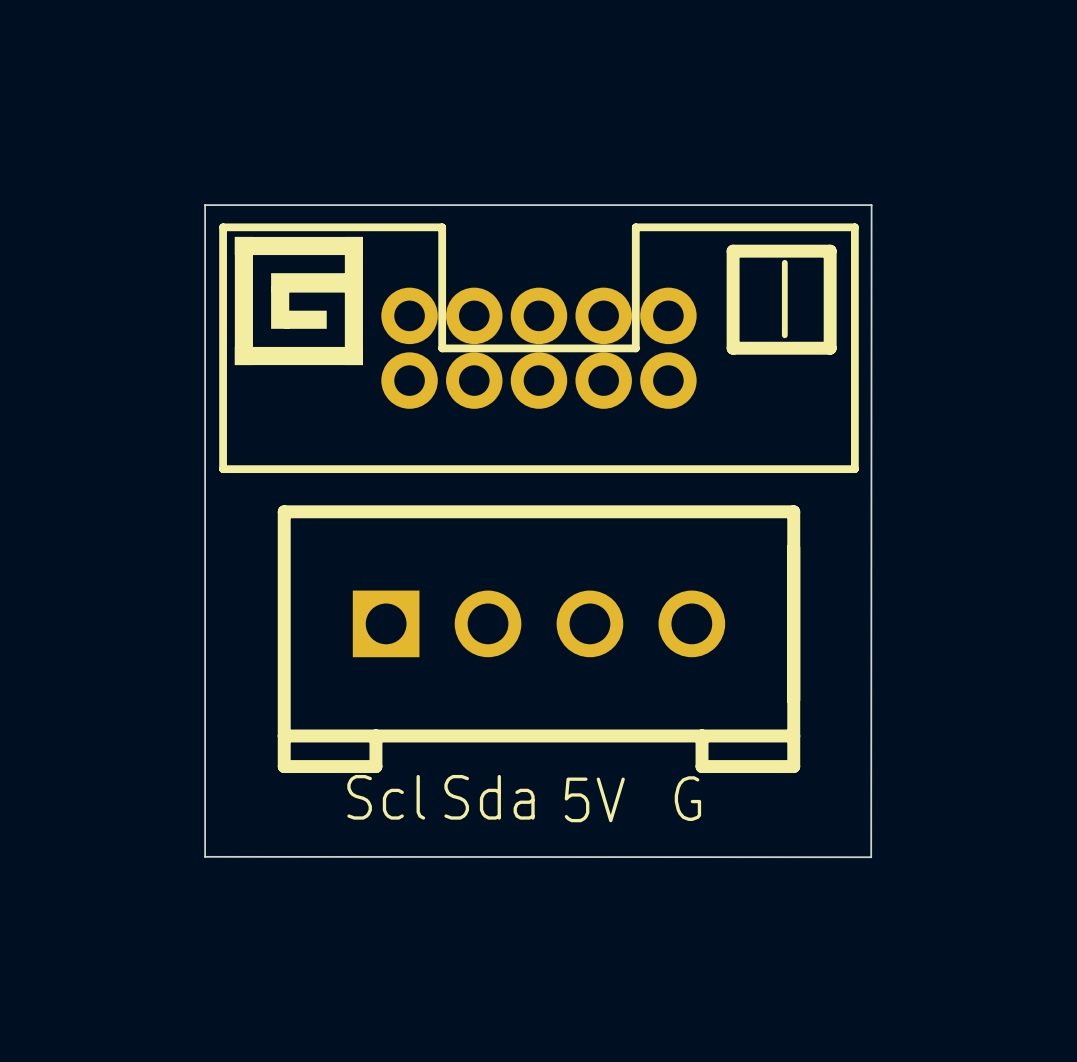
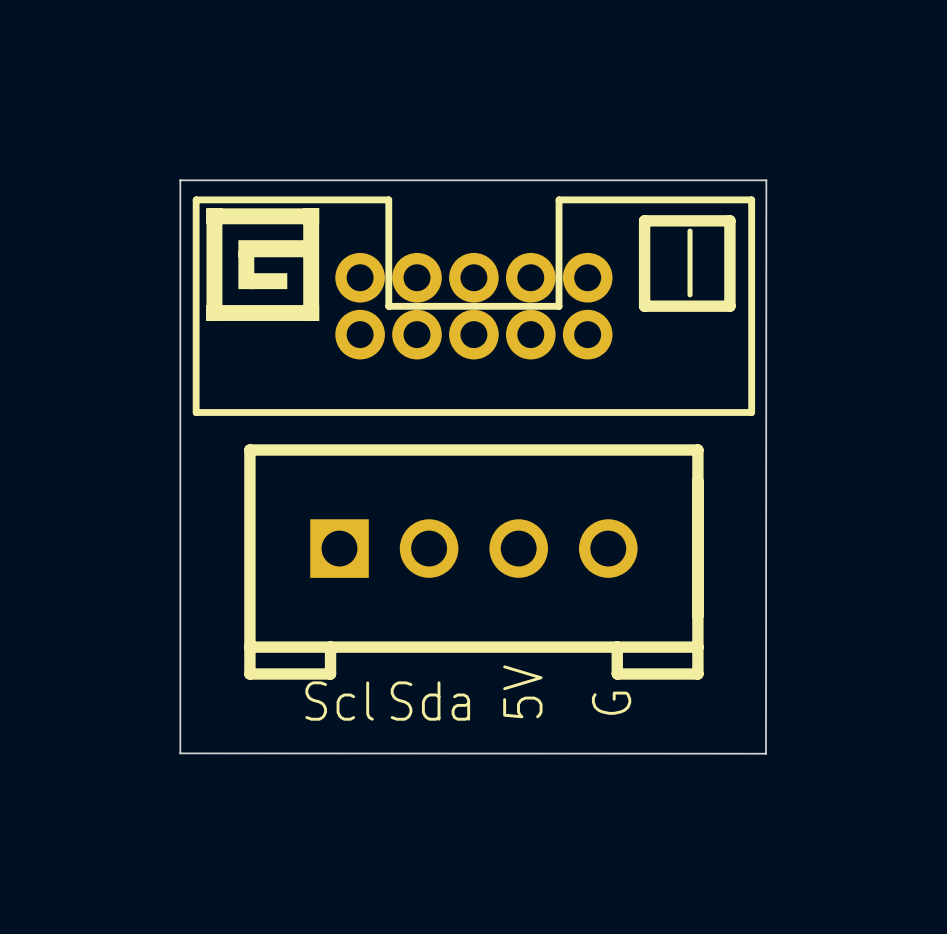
text rotation: 0° (687, 798) -> 90° counterclockwise (611, 703)
text rotation: 0° (594, 799) -> 90° counterclockwise (522, 691)

